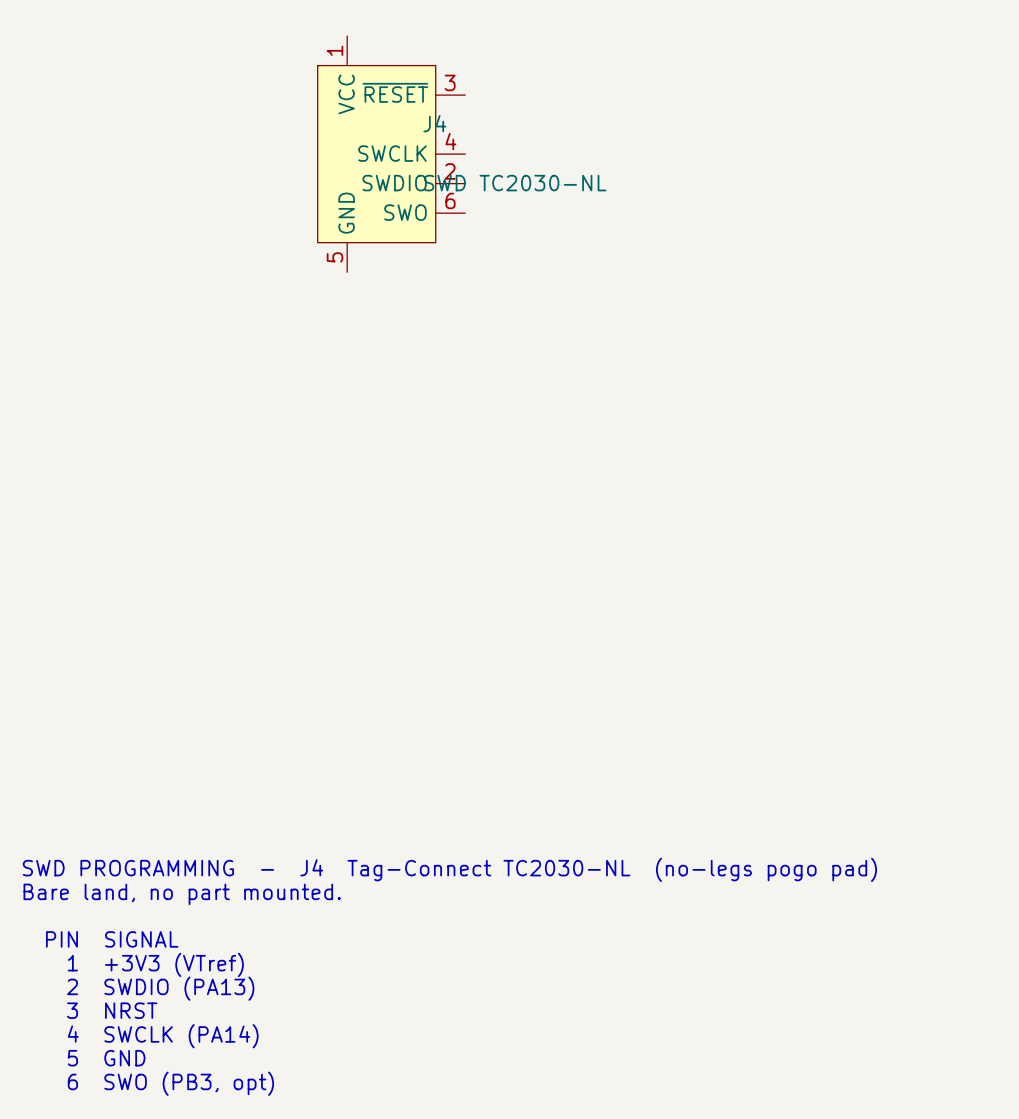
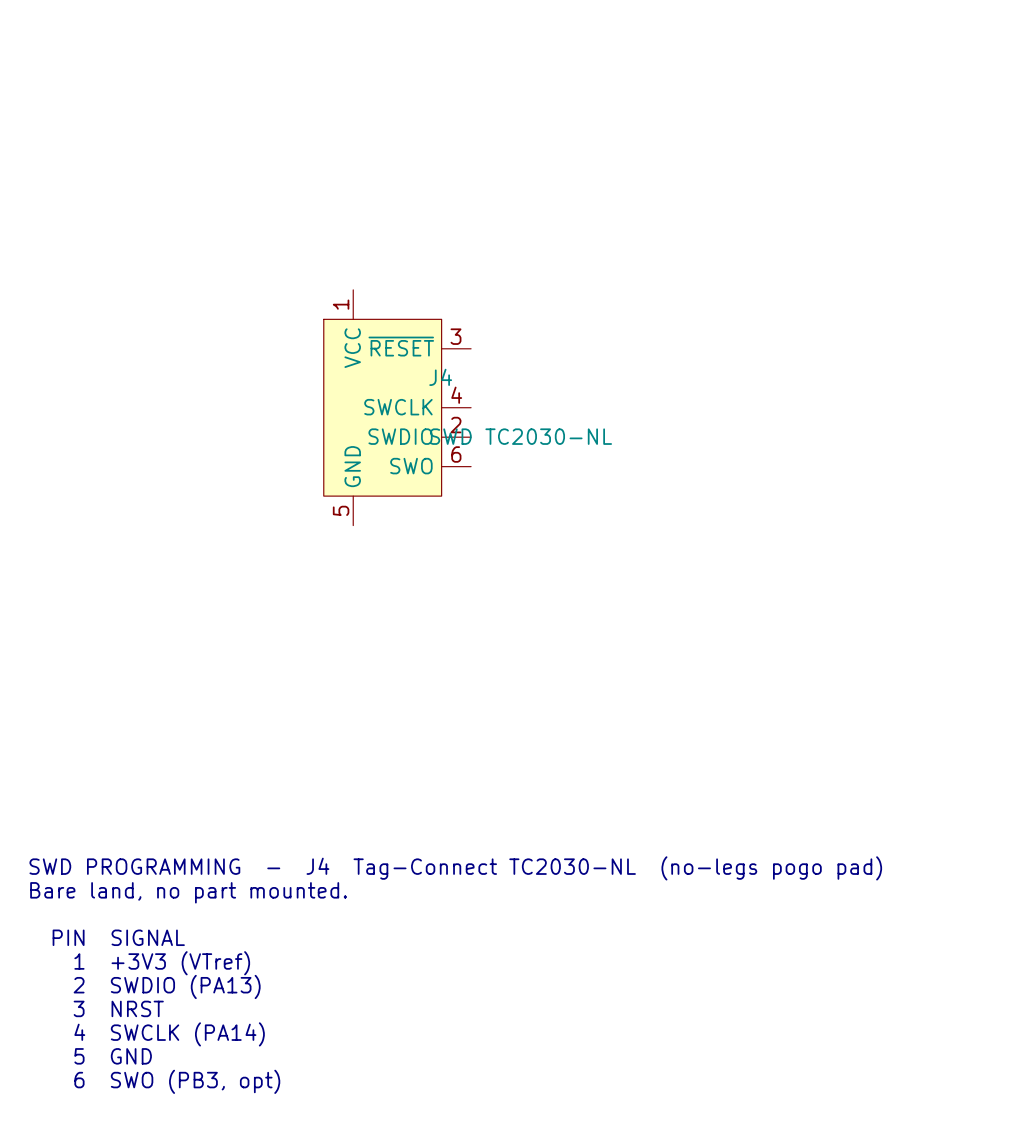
J4 position: (391, 154) -> (397, 407)

